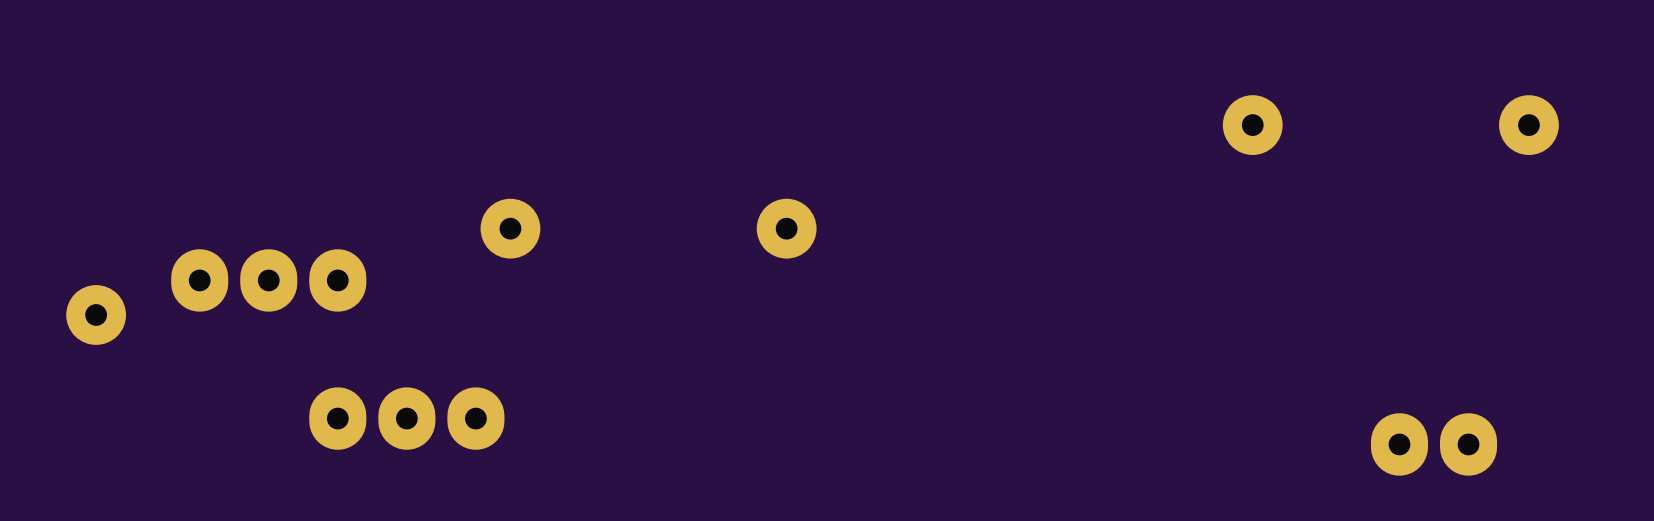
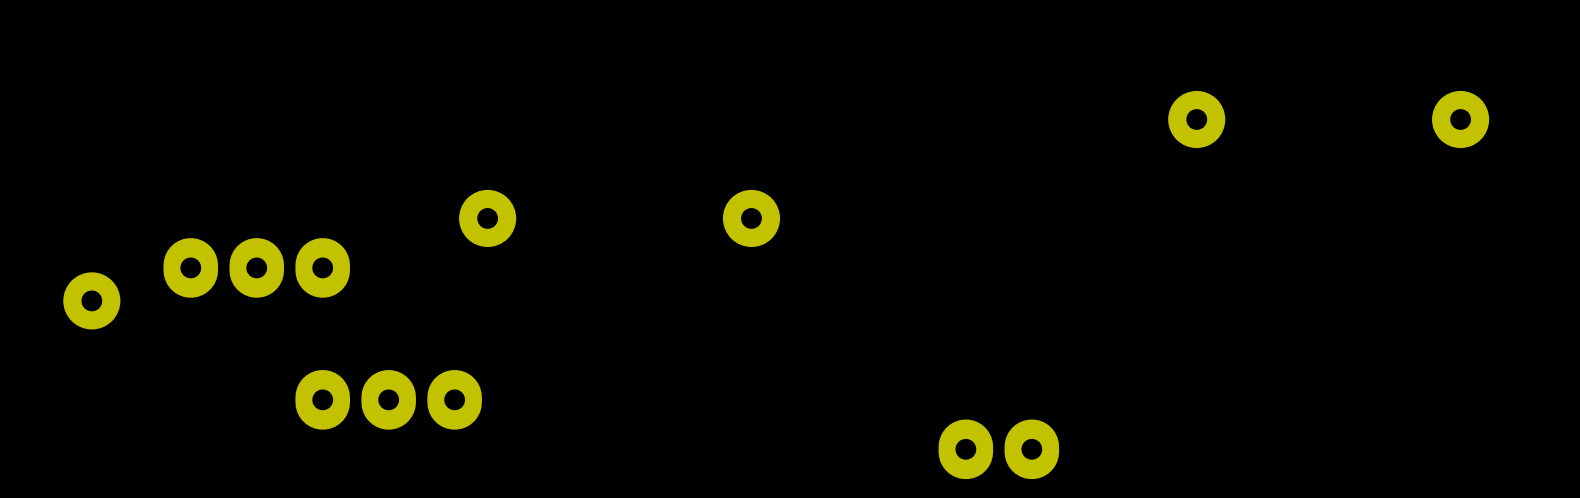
part position: (1434, 444) -> (998, 449)

